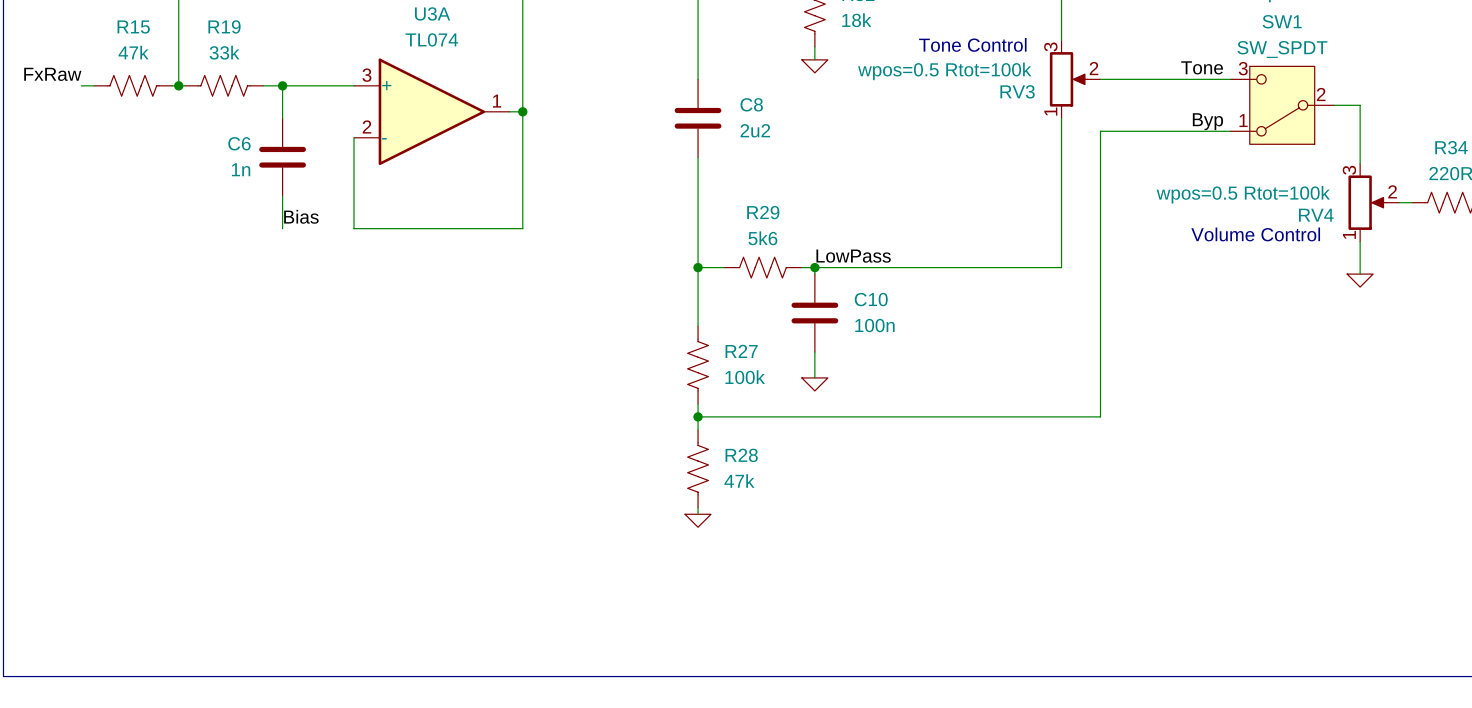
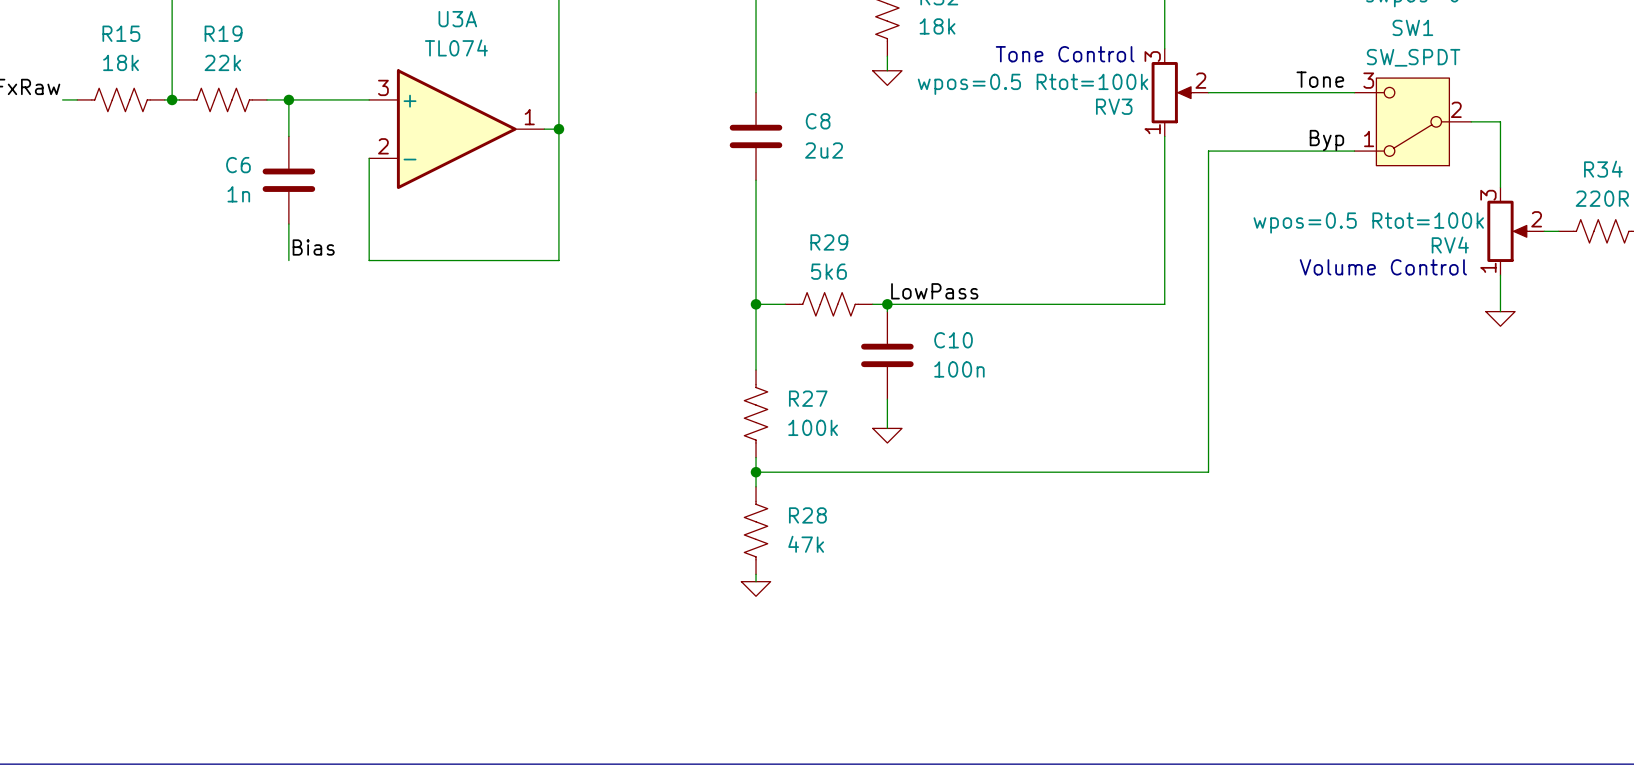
R15 value: 47k (133, 52) -> 18k (121, 62)
R19 value: 33k (224, 52) -> 22k (222, 62)

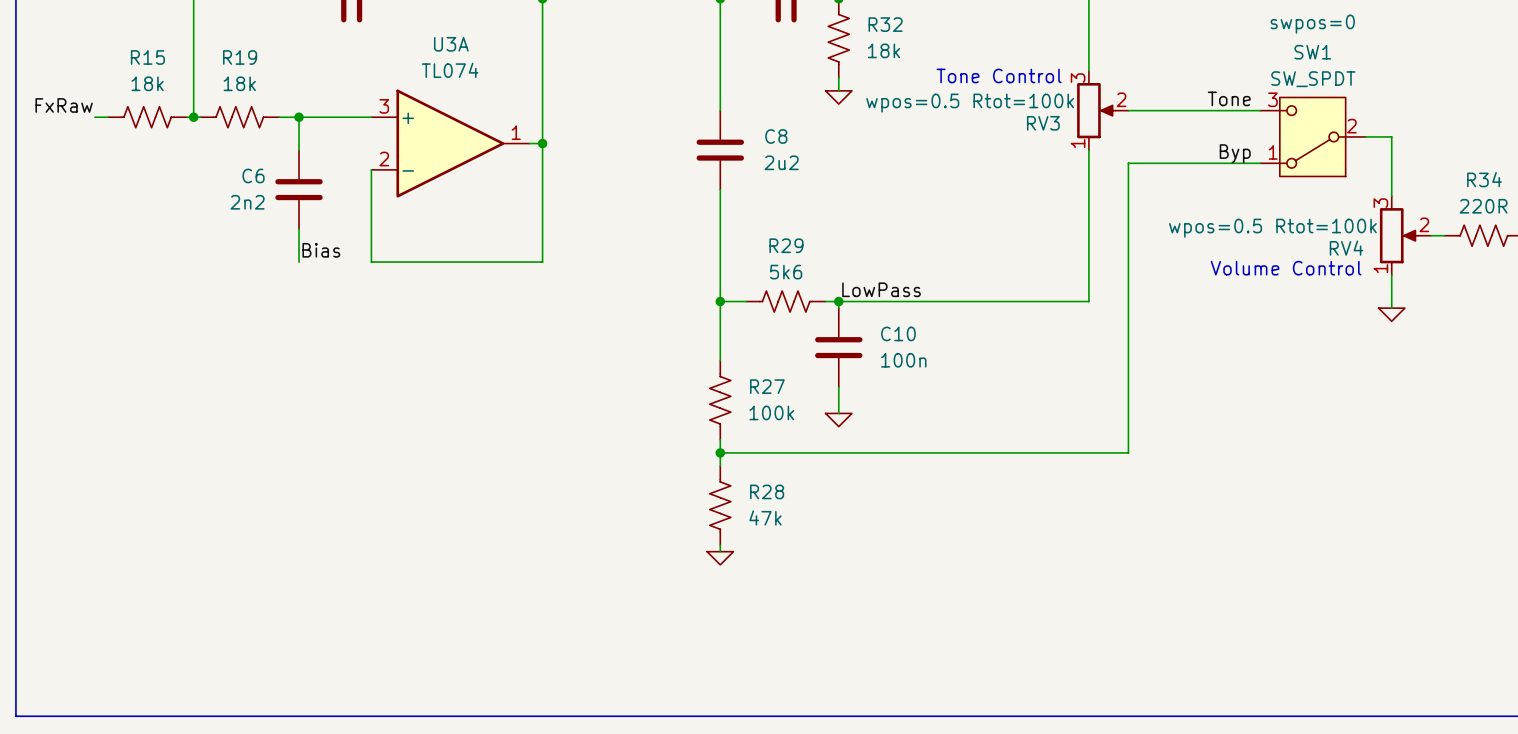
R19 value: 22k (222, 62) -> 18k (239, 83)
C6 value: 1n (238, 194) -> 2n2 (247, 202)

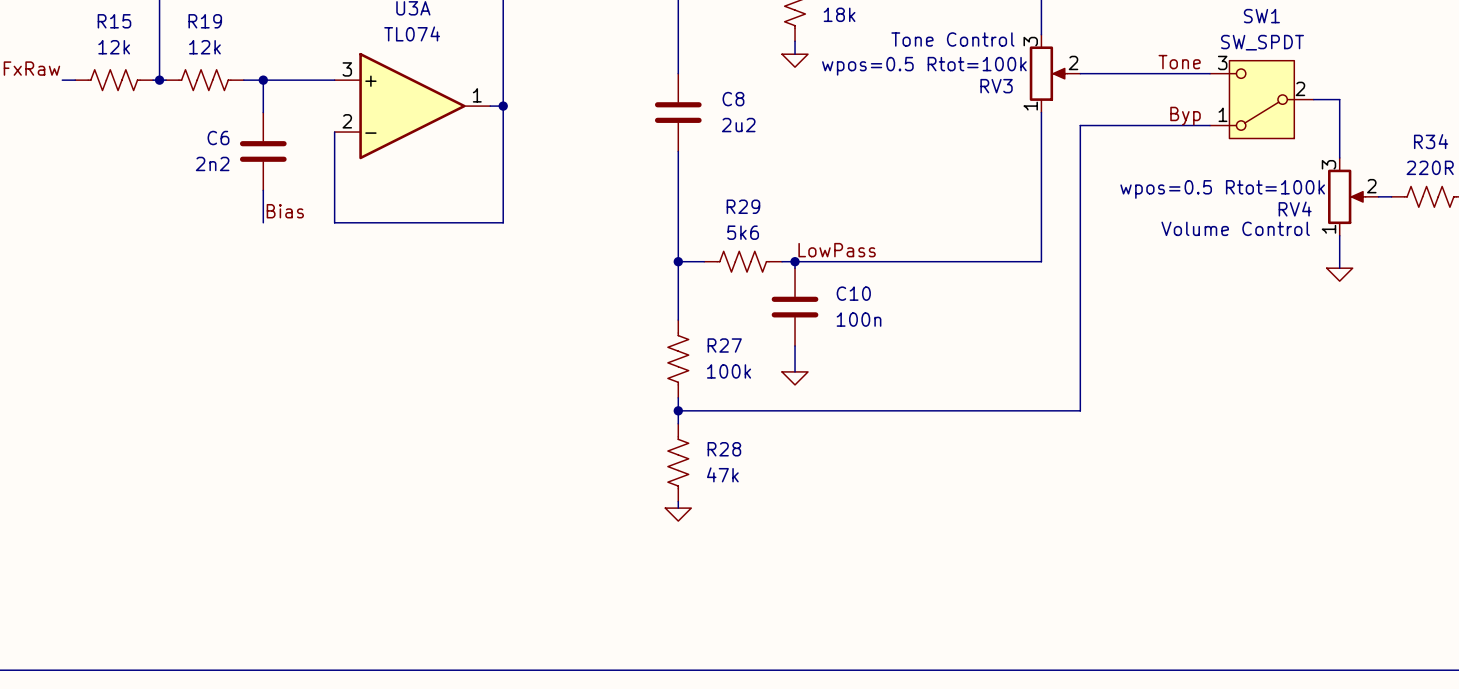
R15 value: 18k (147, 83) -> 12k (114, 47)
R19 value: 18k (239, 83) -> 12k (204, 47)

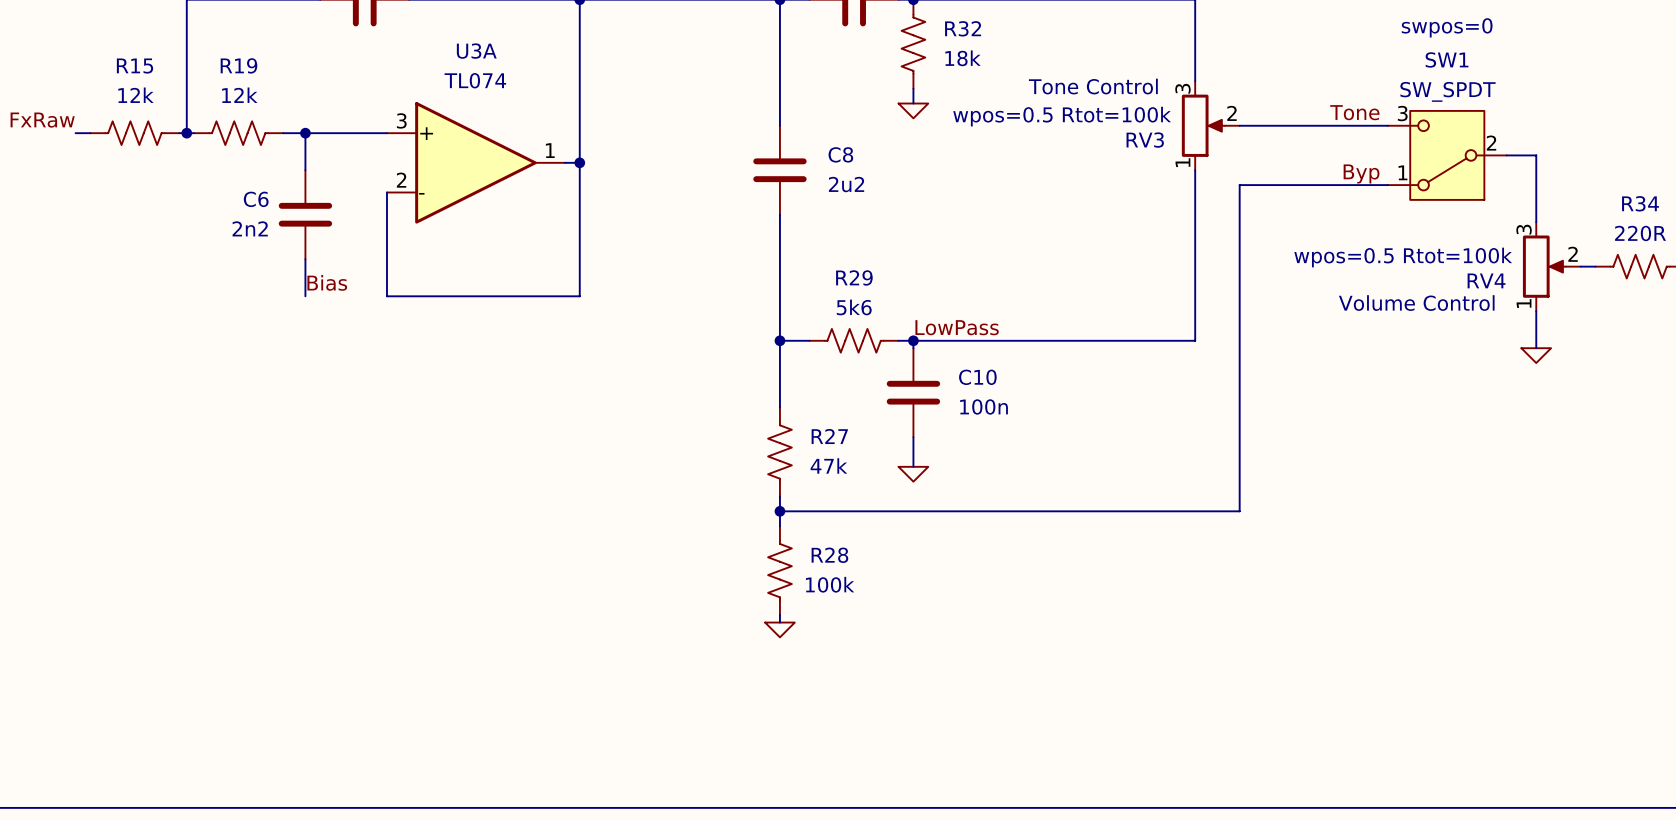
R27 value: 100k (729, 371) -> 47k (828, 465)
R28 value: 47k (722, 474) -> 100k (830, 584)

